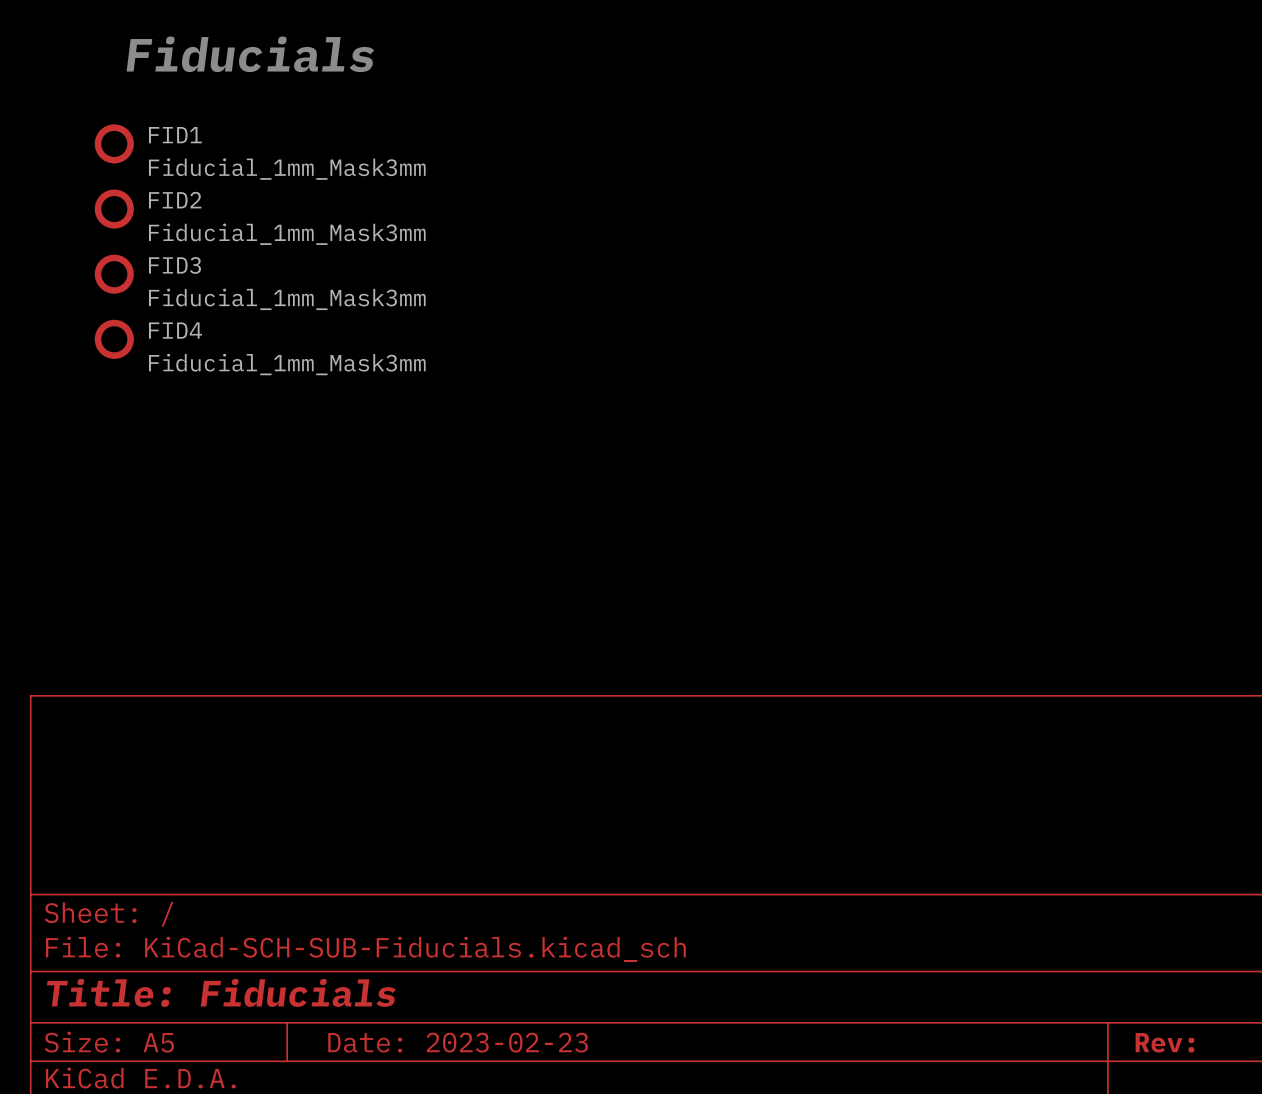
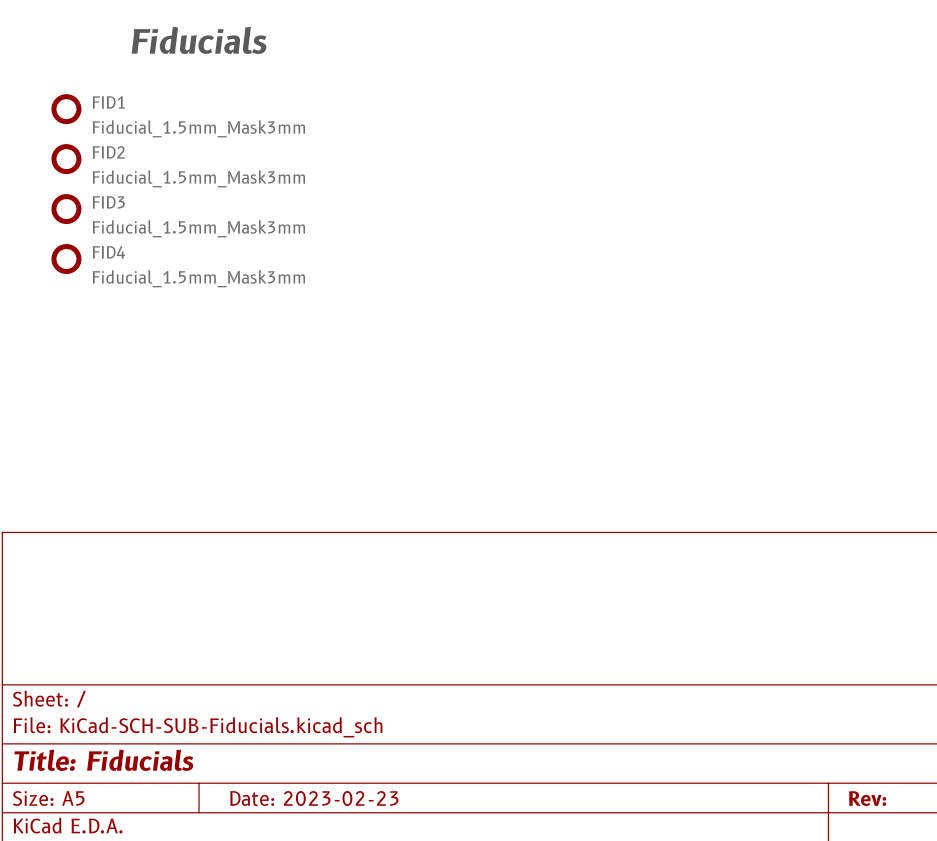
FID1 value: Fiducial_1mm_Mask3mm (287, 169) -> Fiducial_1.5mm_Mask3mm (198, 128)
FID2 value: Fiducial_1mm_Mask3mm (287, 234) -> Fiducial_1.5mm_Mask3mm (198, 178)
FID3 value: Fiducial_1mm_Mask3mm (287, 299) -> Fiducial_1.5mm_Mask3mm (198, 228)
FID4 value: Fiducial_1mm_Mask3mm (287, 364) -> Fiducial_1.5mm_Mask3mm (198, 278)

